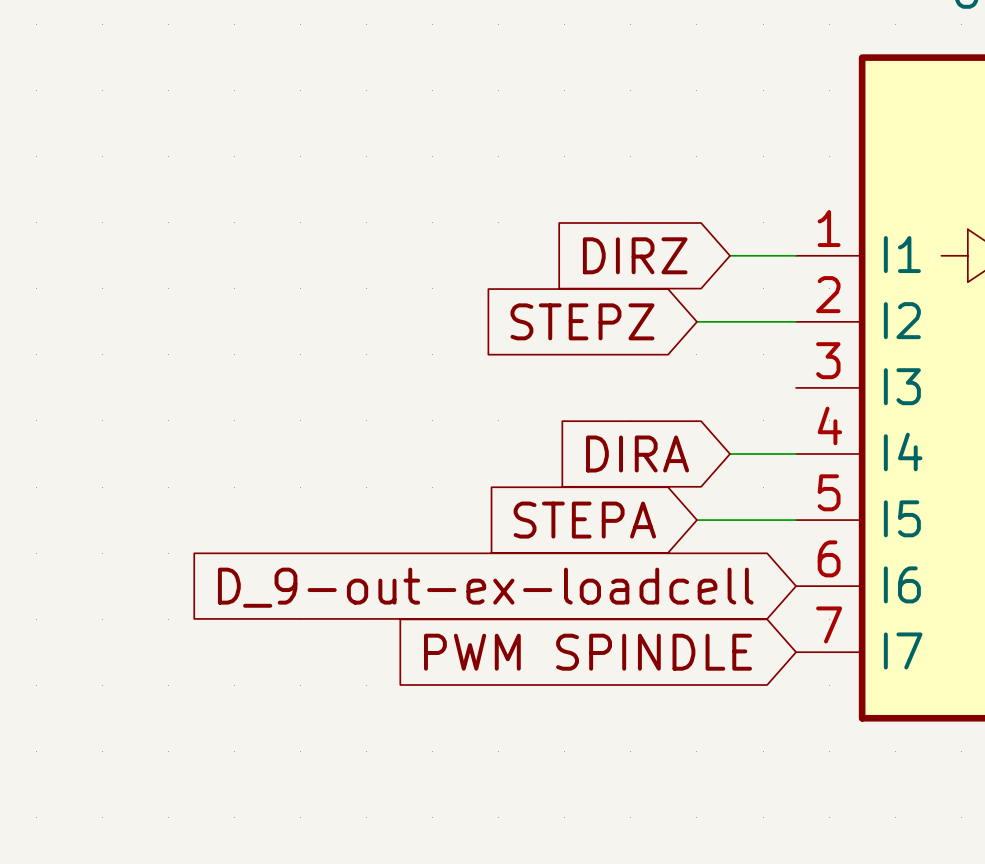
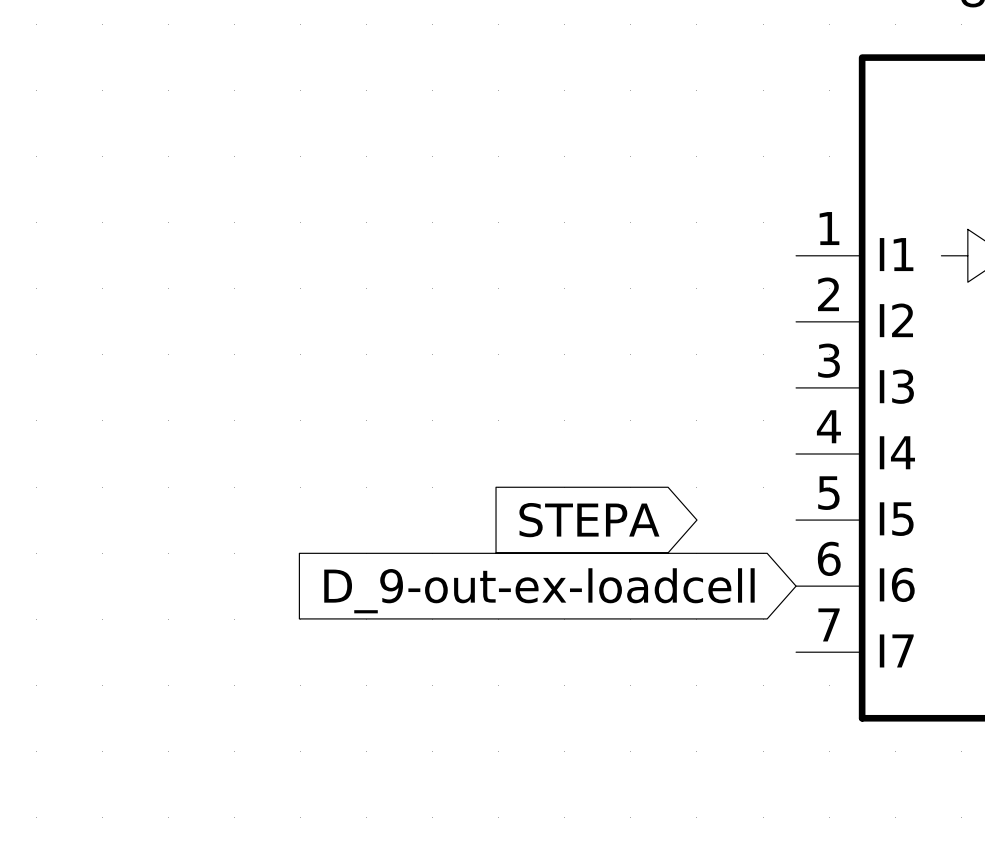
global label: DIRZ (635, 255) -> none
wire: (730, 255) (796, 255) -> none
global label: STEPZ (582, 321) -> none
wire: (696, 321) (796, 321) -> none
global label: DIRA (637, 454) -> none
wire: (730, 454) (796, 454) -> none
wire: (696, 520) (796, 520) -> none
global label: PWM SPINDLE (587, 652) -> none

